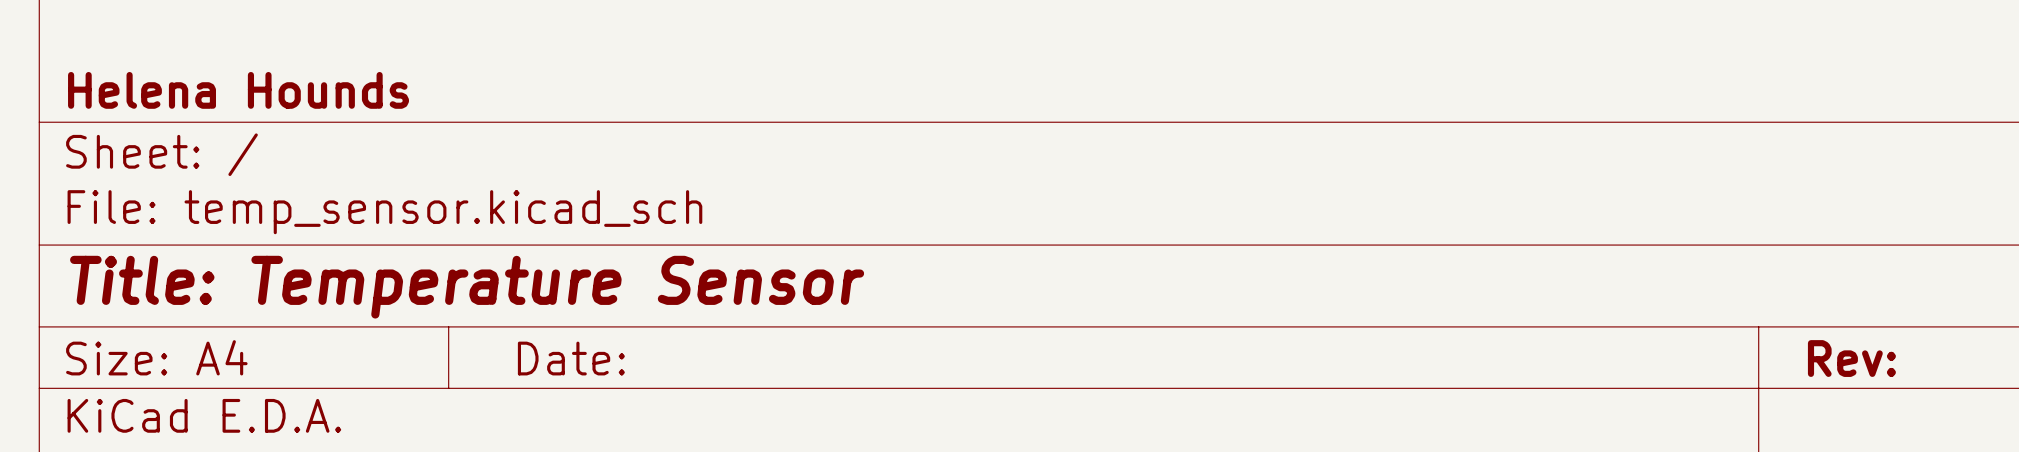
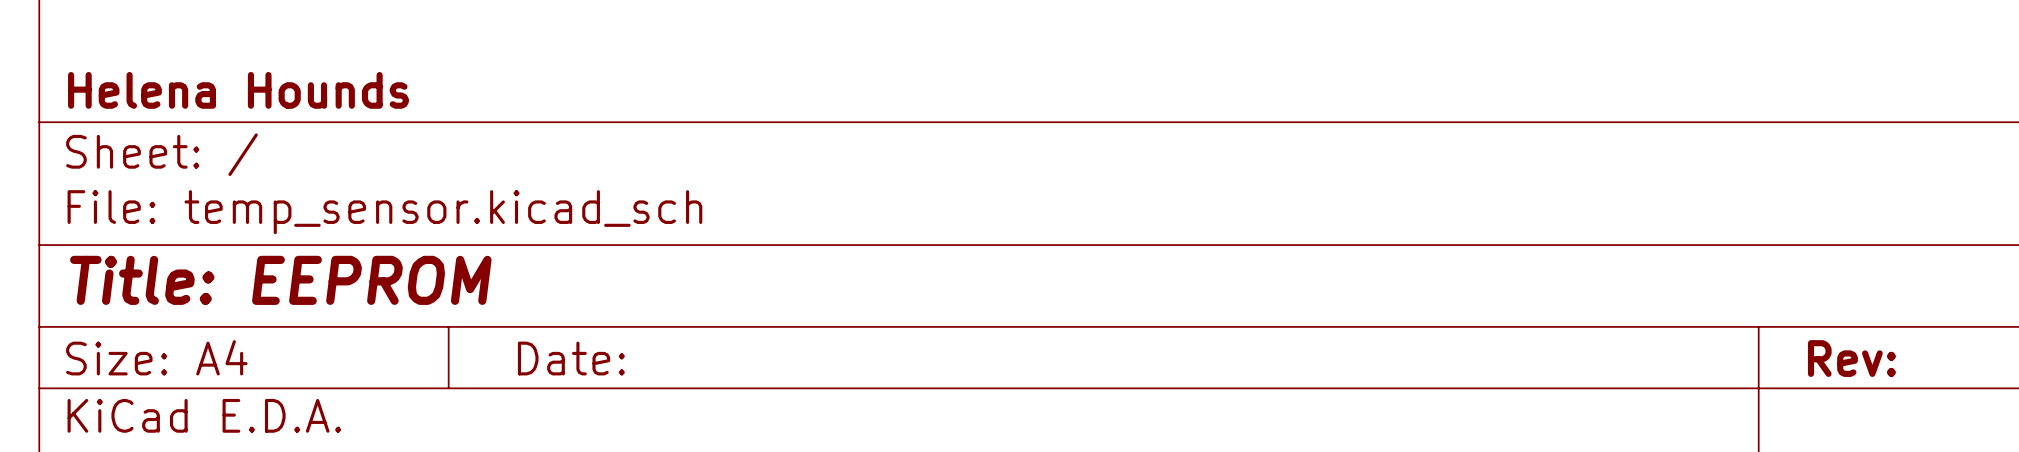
title block: Title: Temperature Sensor (467, 287) -> Title: EEPROM (280, 280)

